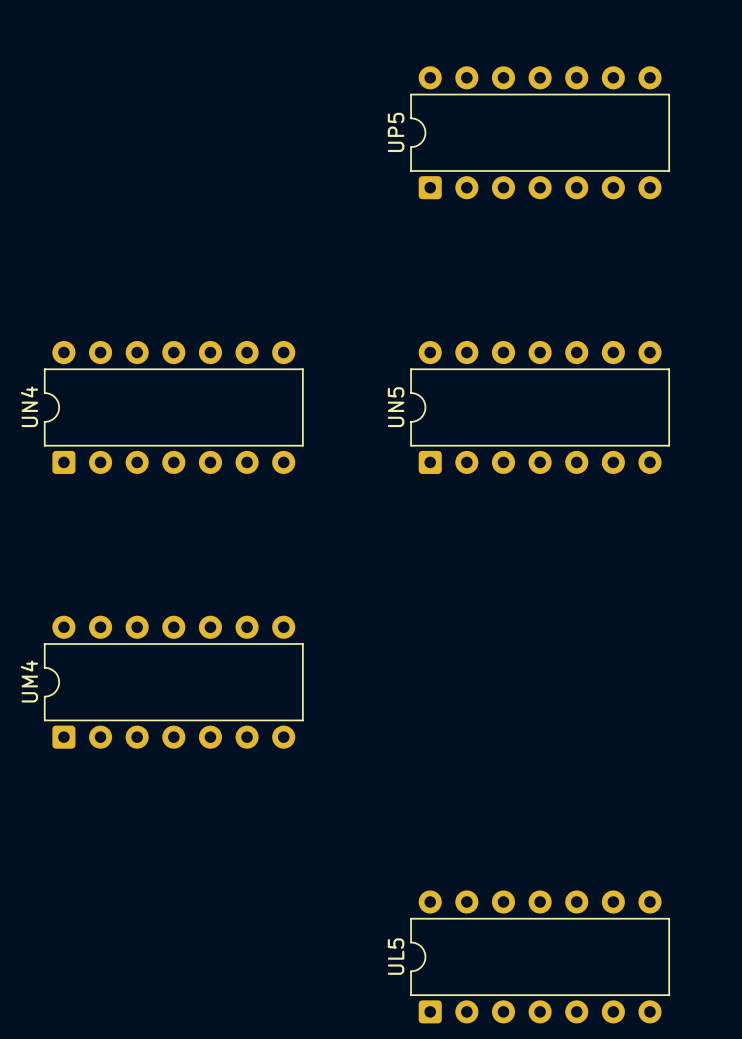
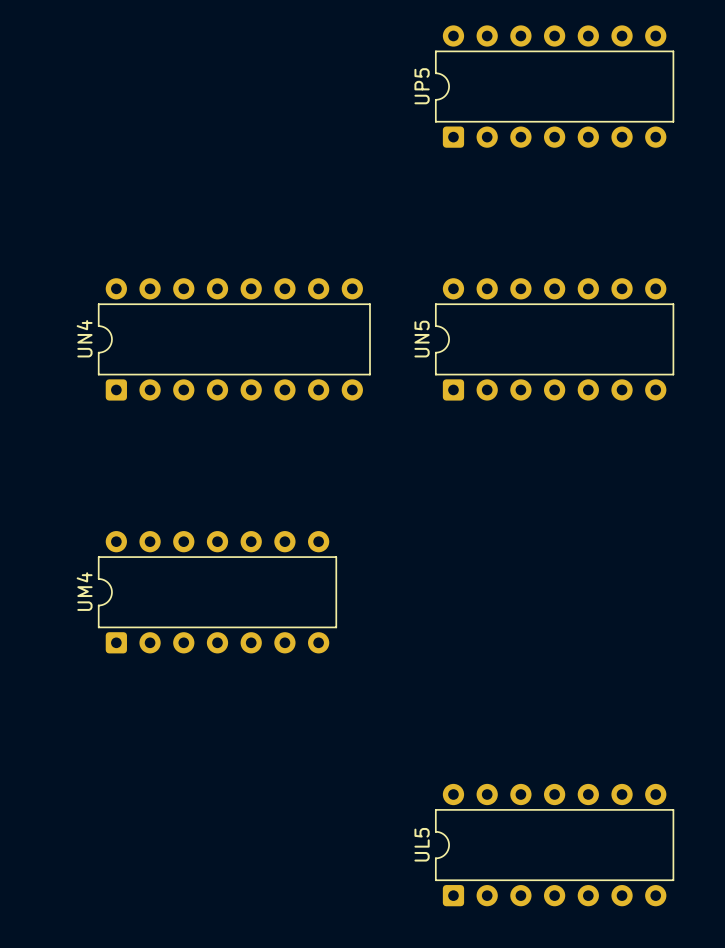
UN4 footprint: [43, 341, 304, 474] -> [97, 278, 371, 401]

